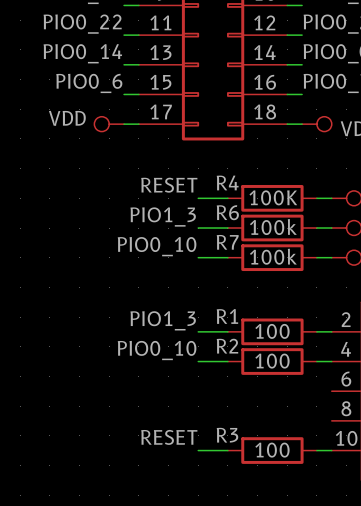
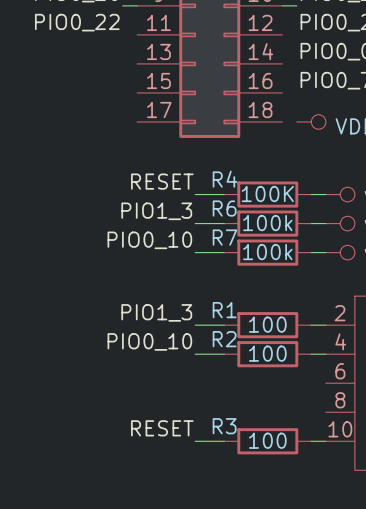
wire: (124, 35) (138, 35) -> none
wire: (287, 35) (302, 35) -> none
label: PIO0_14 (82, 53) -> none
wire: (124, 64) (138, 64) -> none
wire: (287, 64) (302, 64) -> none
label: PIO0_6 (89, 83) -> none
wire: (124, 94) (138, 94) -> none
wire: (287, 94) (302, 94) -> none
power symbol: VDD (109, 124) -> none
wire: (124, 124) (138, 124) -> none
wire: (287, 124) (302, 124) -> none

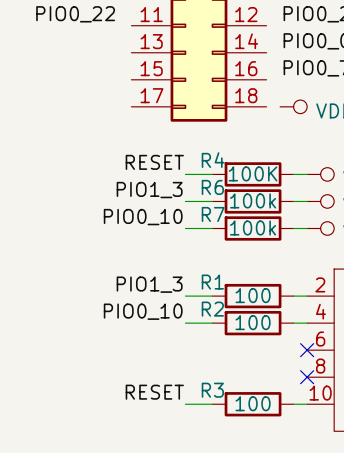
no-connect mark: none -> (307, 350)
no-connect mark: none -> (307, 377)

